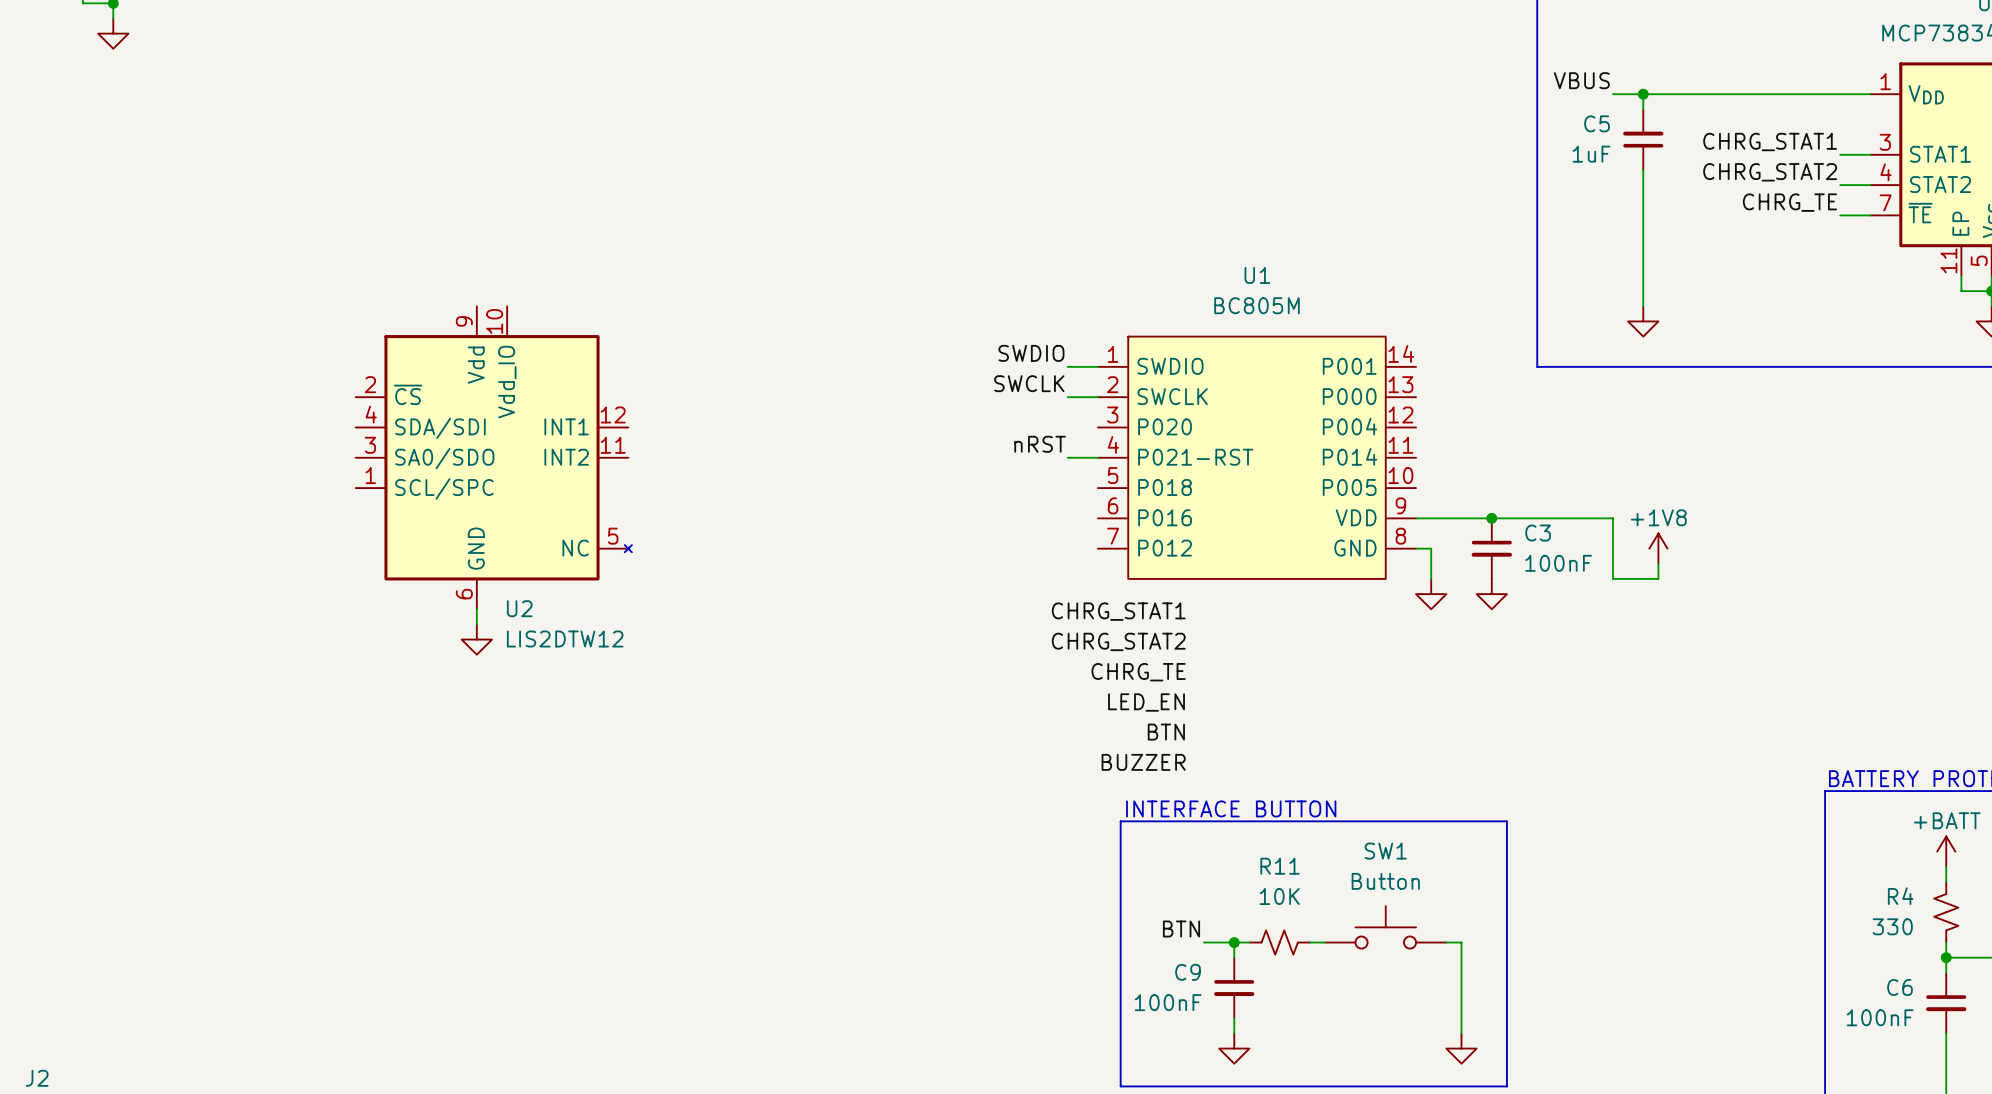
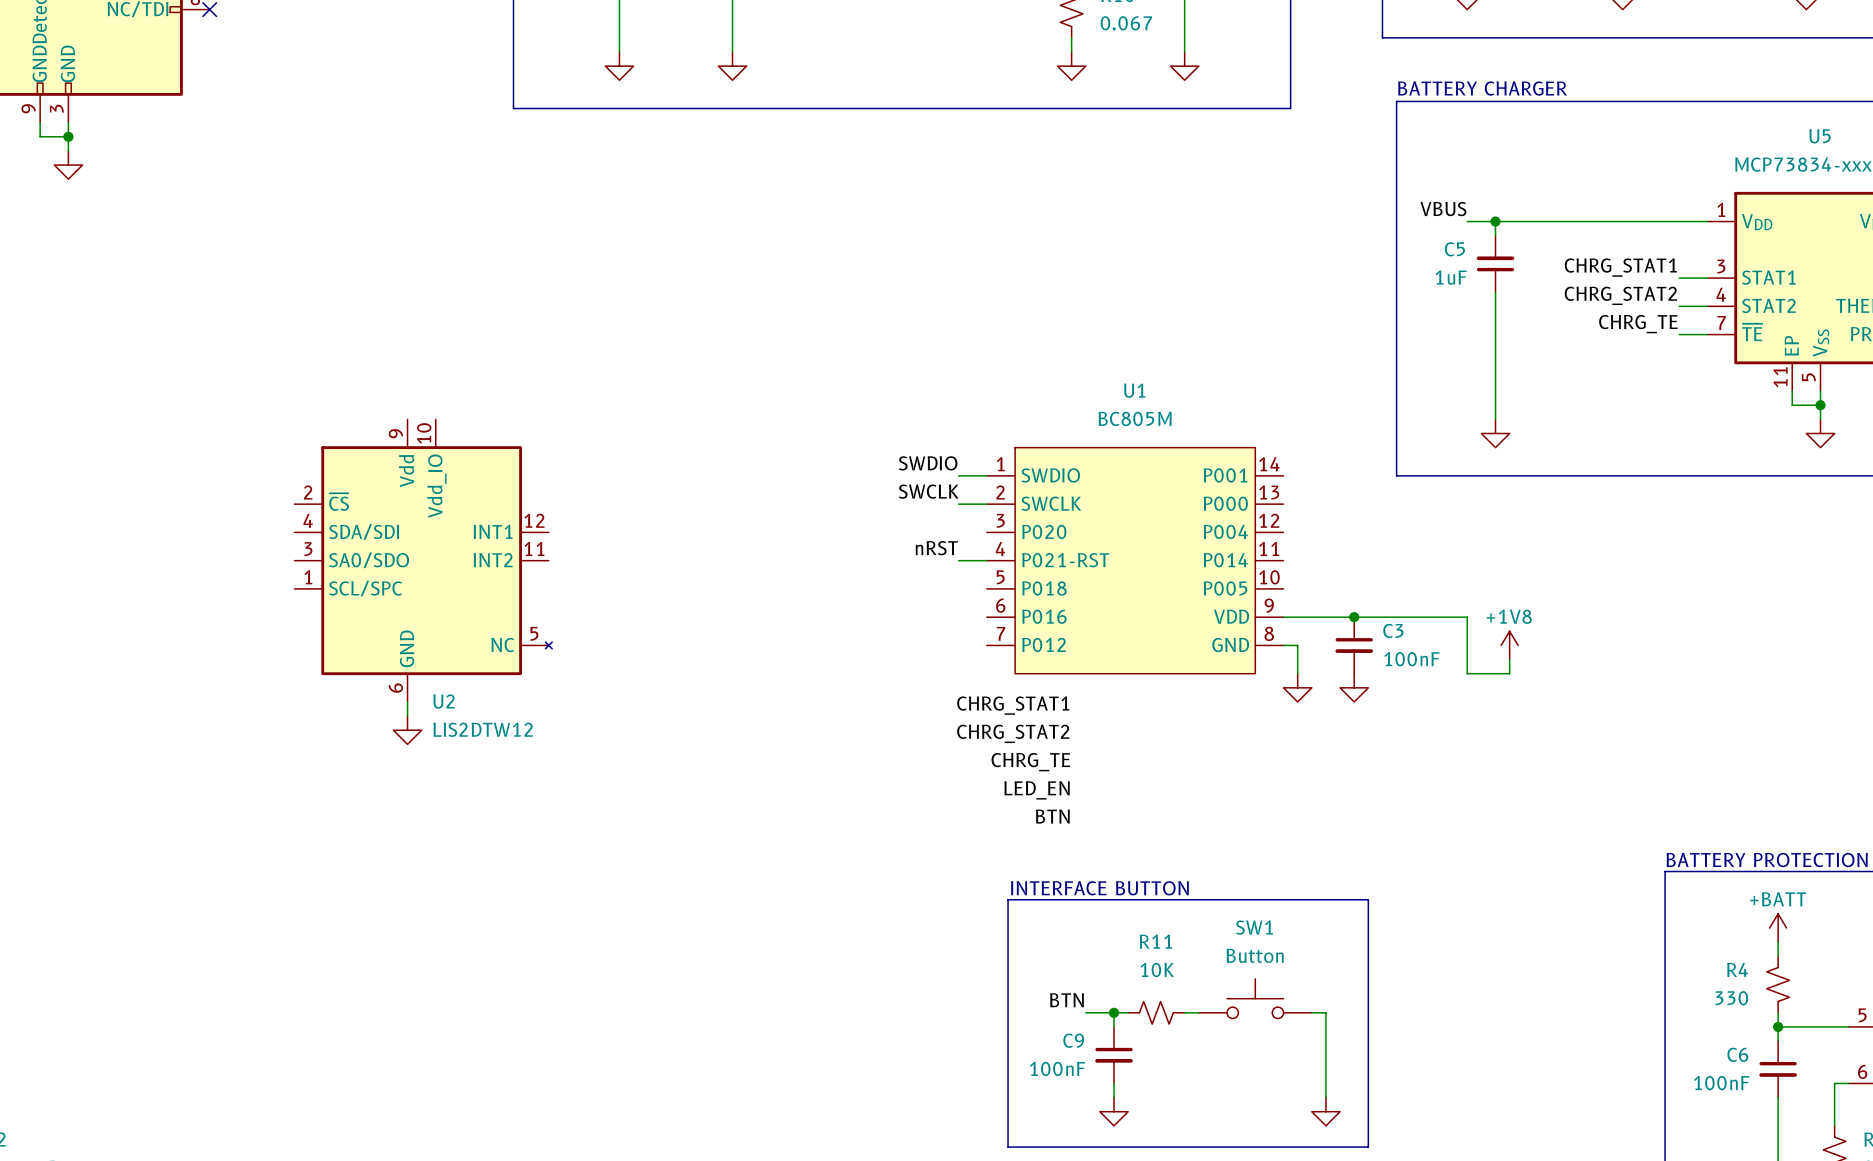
label: BUZZER (1143, 762) -> none

